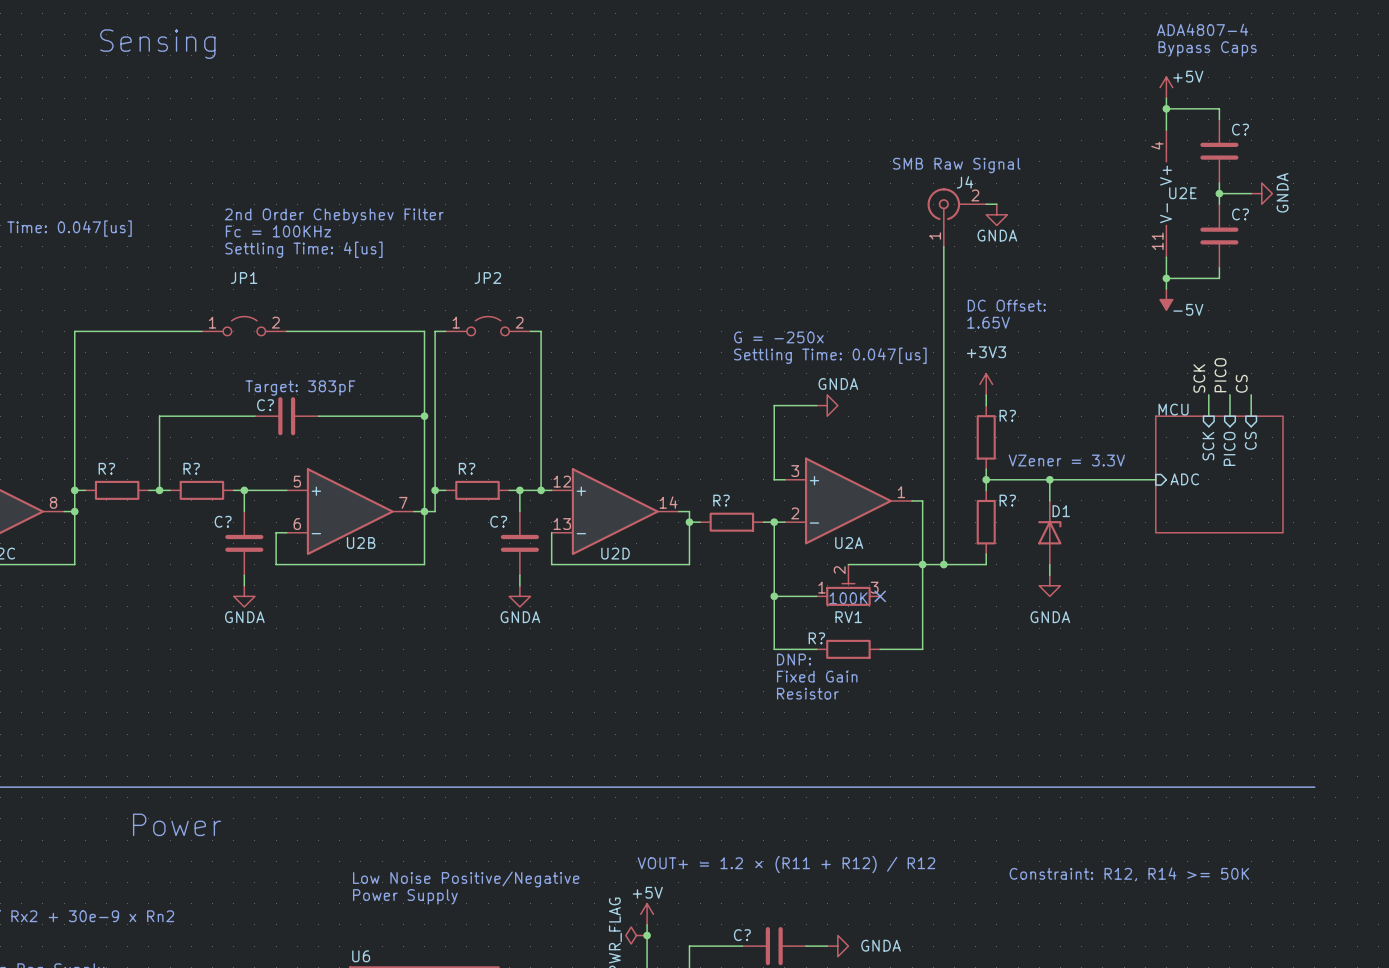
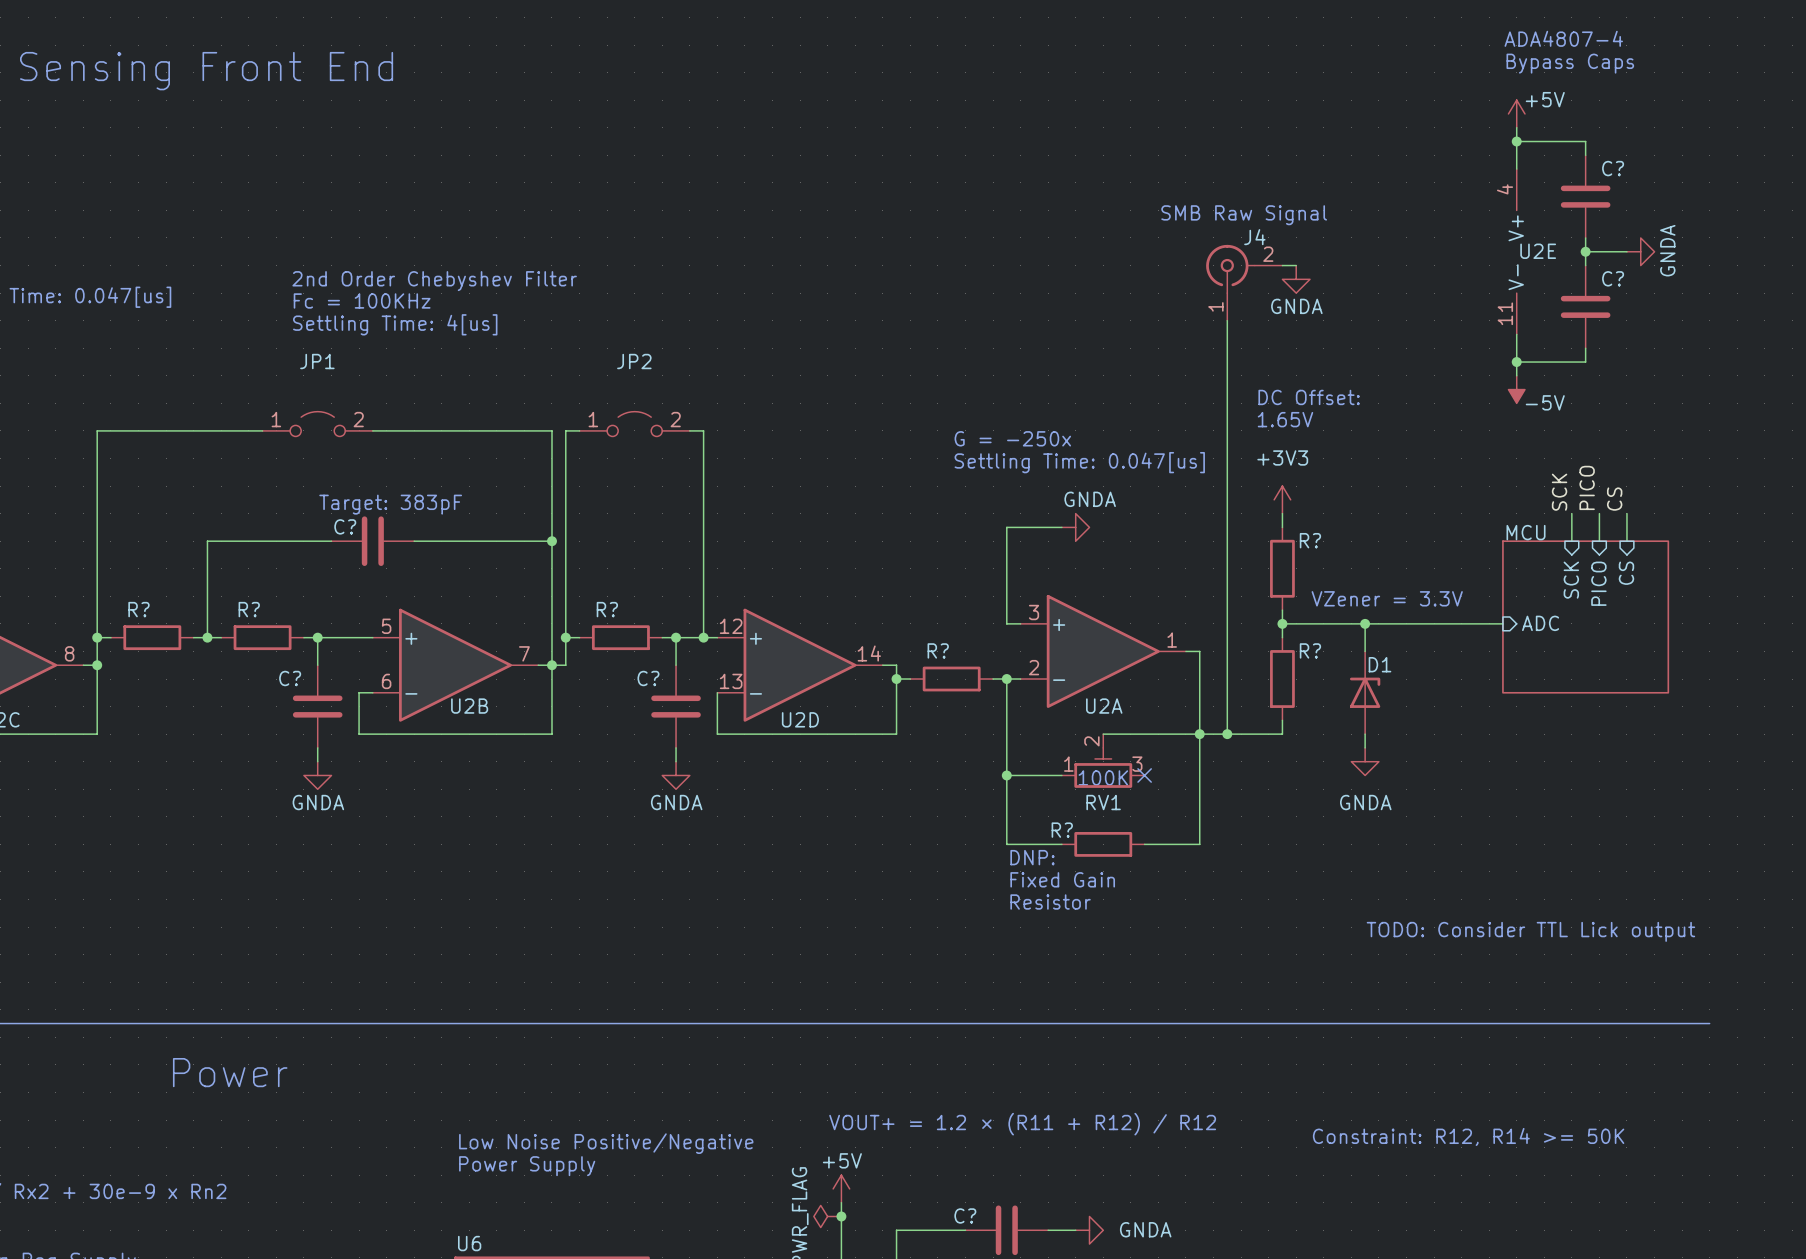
text: Sensing (157, 44) -> none
text: none -> Sensing Front End (206, 71)
text: none -> TODO: Consider TTL Lick output (1530, 931)

